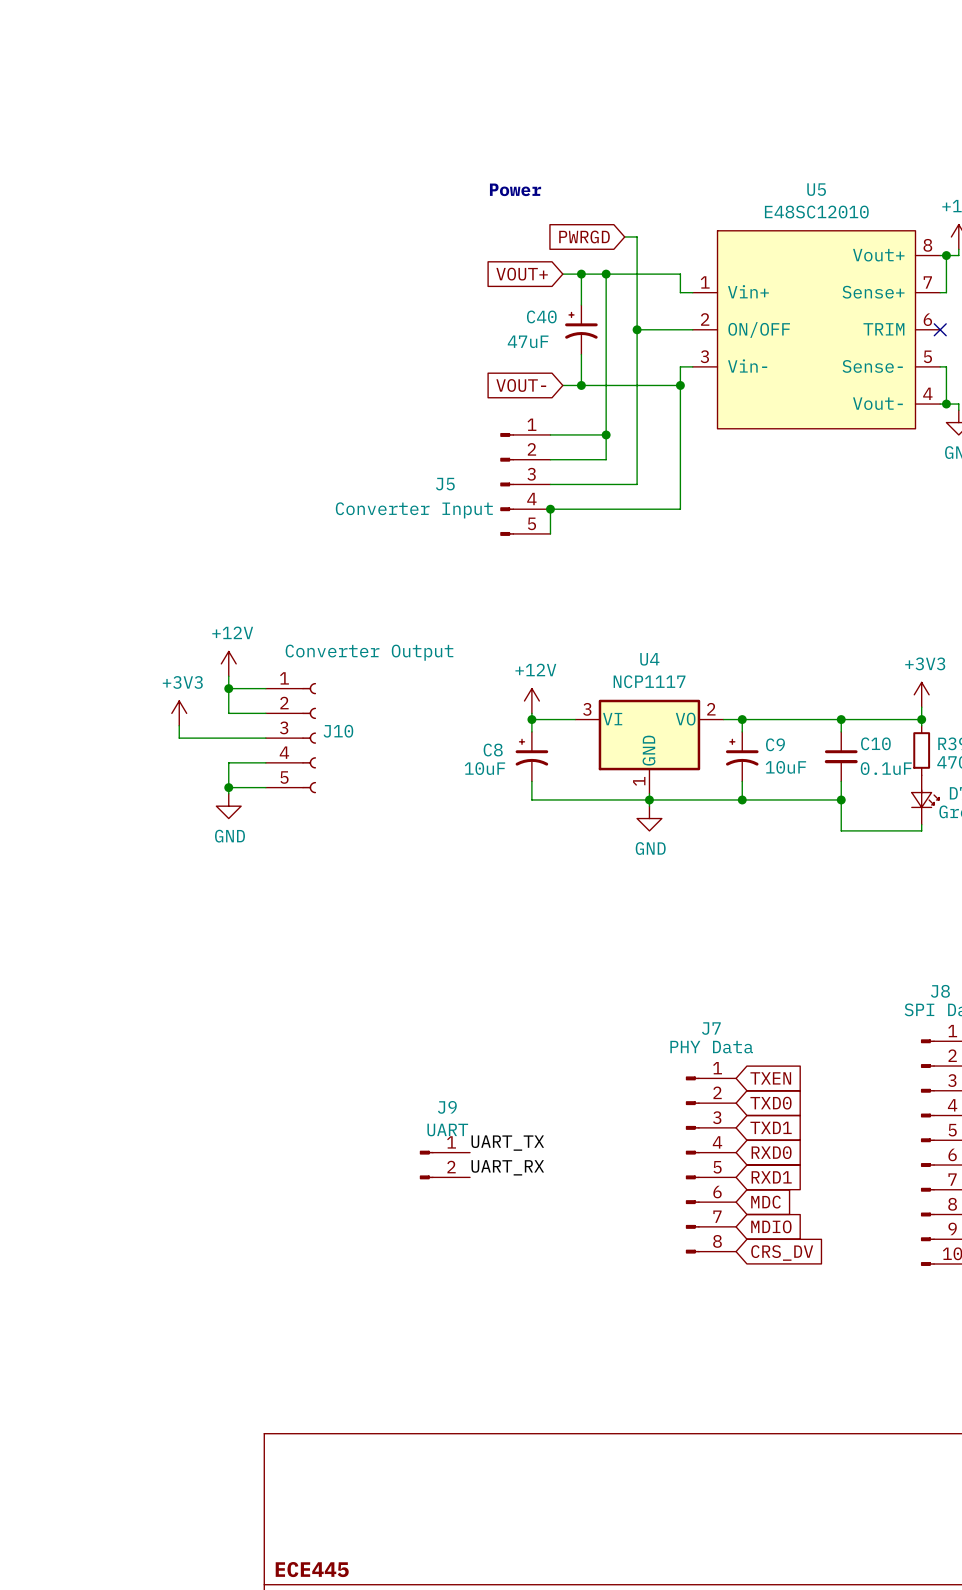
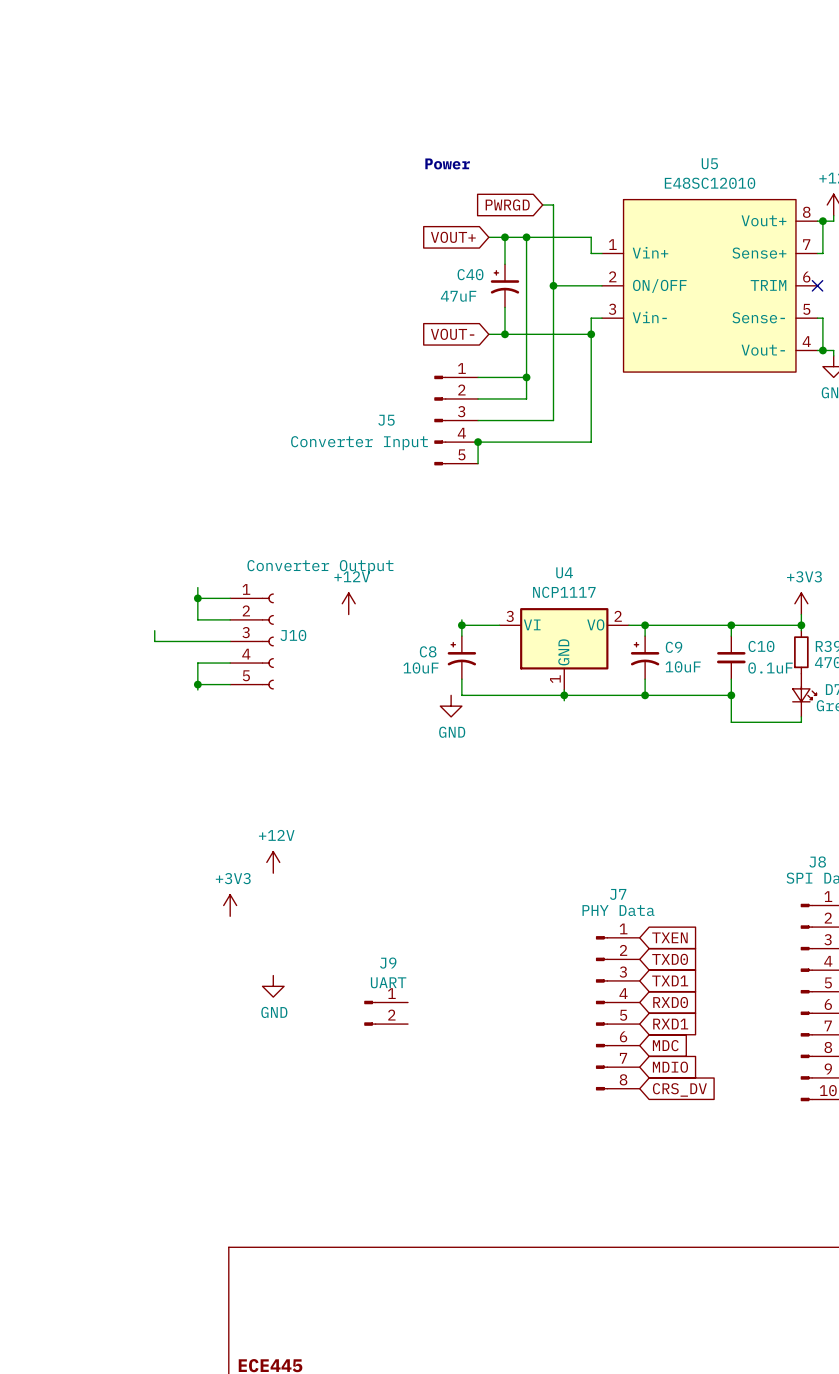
power symbol: +12V (228, 663) -> none
power symbol: none -> +12V (348, 603)
power symbol: +12V (531, 700) -> none
power symbol: +3V3 (179, 713) -> none
power symbol: GND (228, 806) -> none
power symbol position: GND (649, 818) -> GND (451, 706)
power symbol: none -> +12V (273, 862)
power symbol: none -> +3V3 (230, 905)
power symbol: none -> GND (273, 986)
label: UART_TX (507, 1143) -> none
label: UART_RX (507, 1167) -> none

